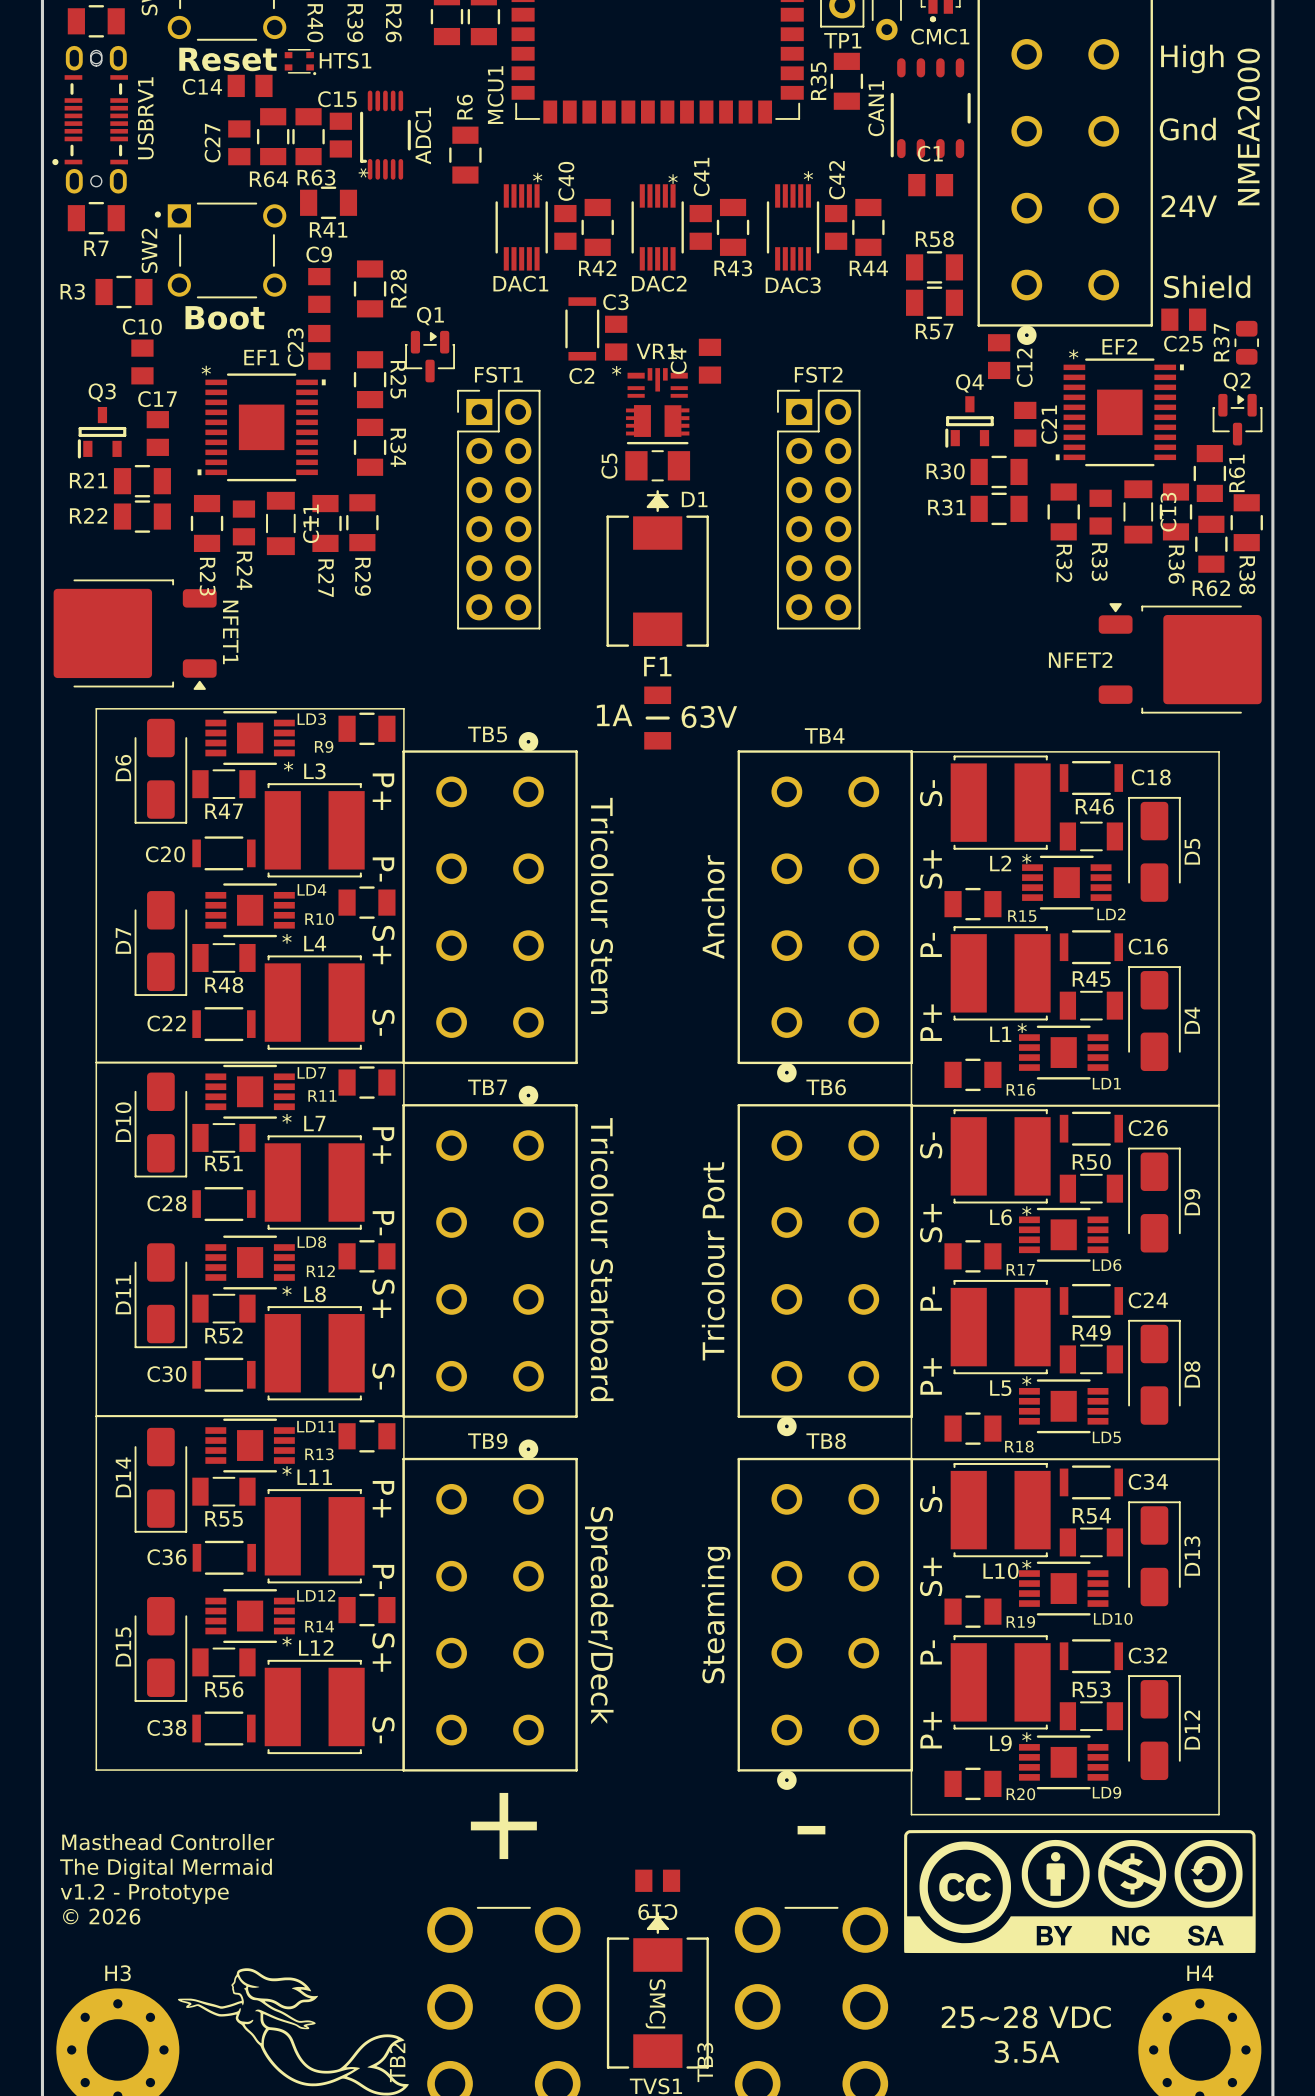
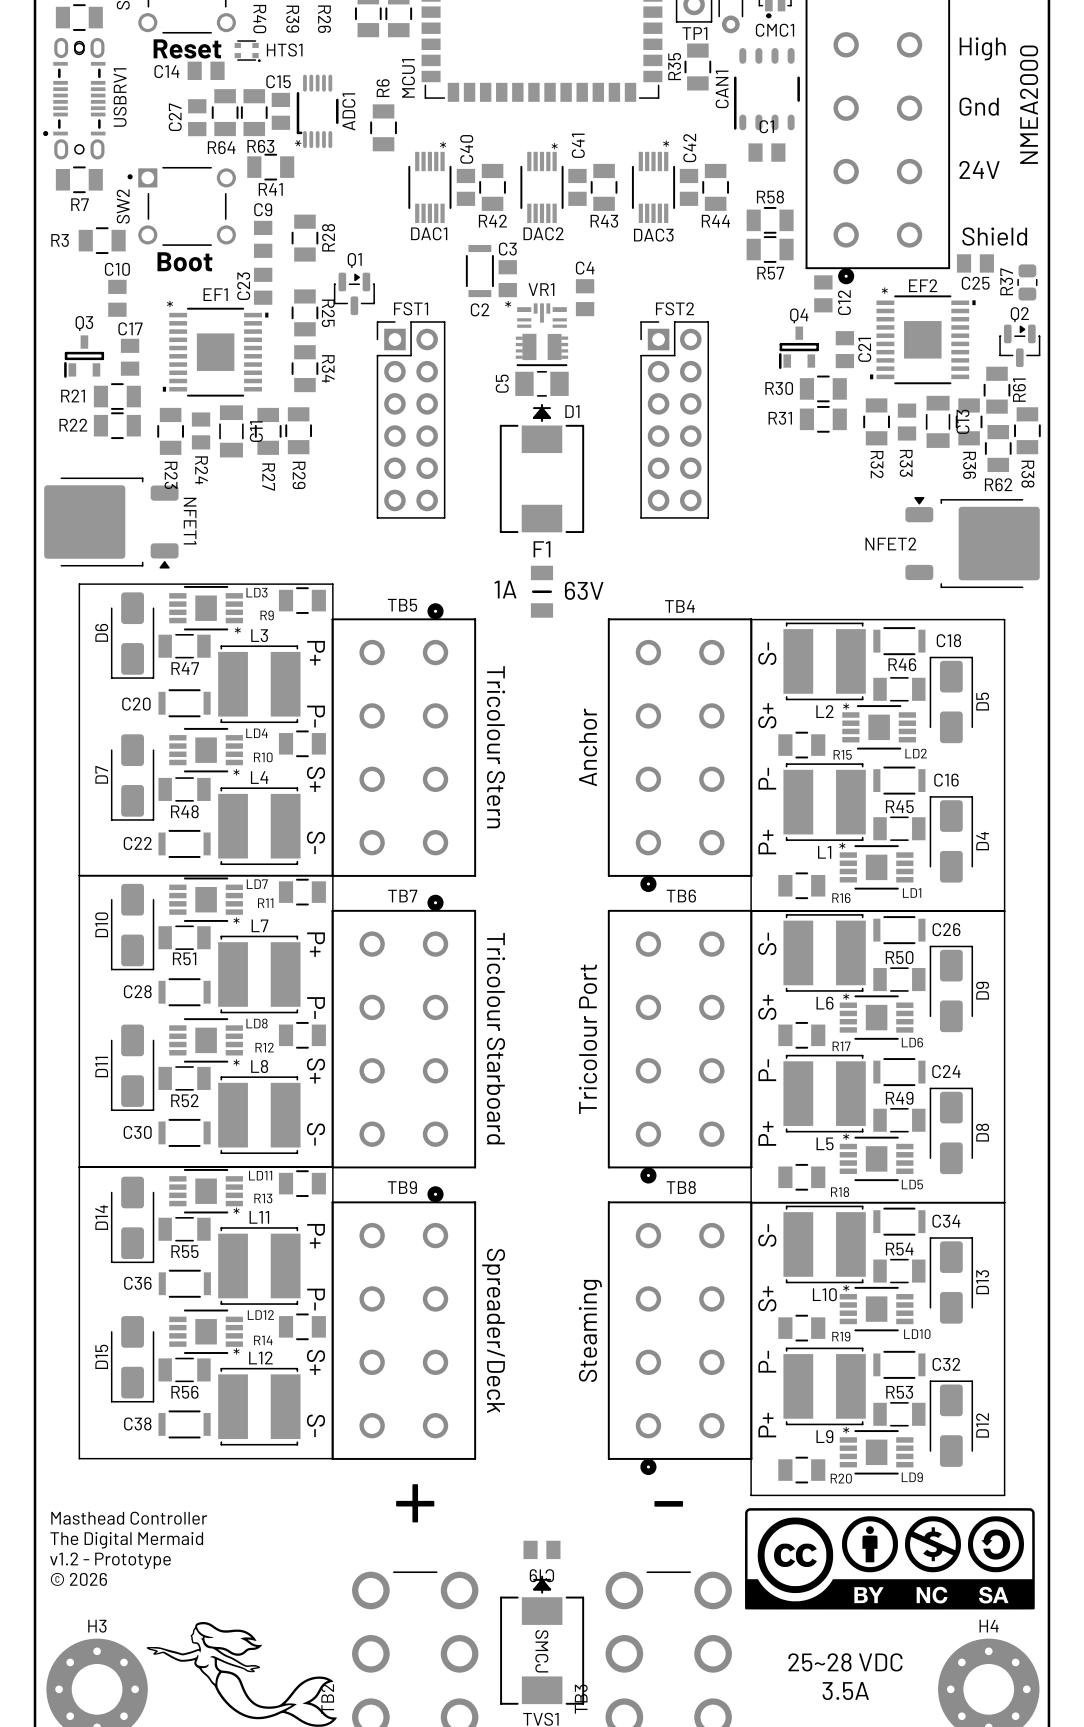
C4 name rotation: 0° (678, 361) -> 90° clockwise (585, 268)
C4 name position: C4 (678, 361) -> C4 (585, 268)

